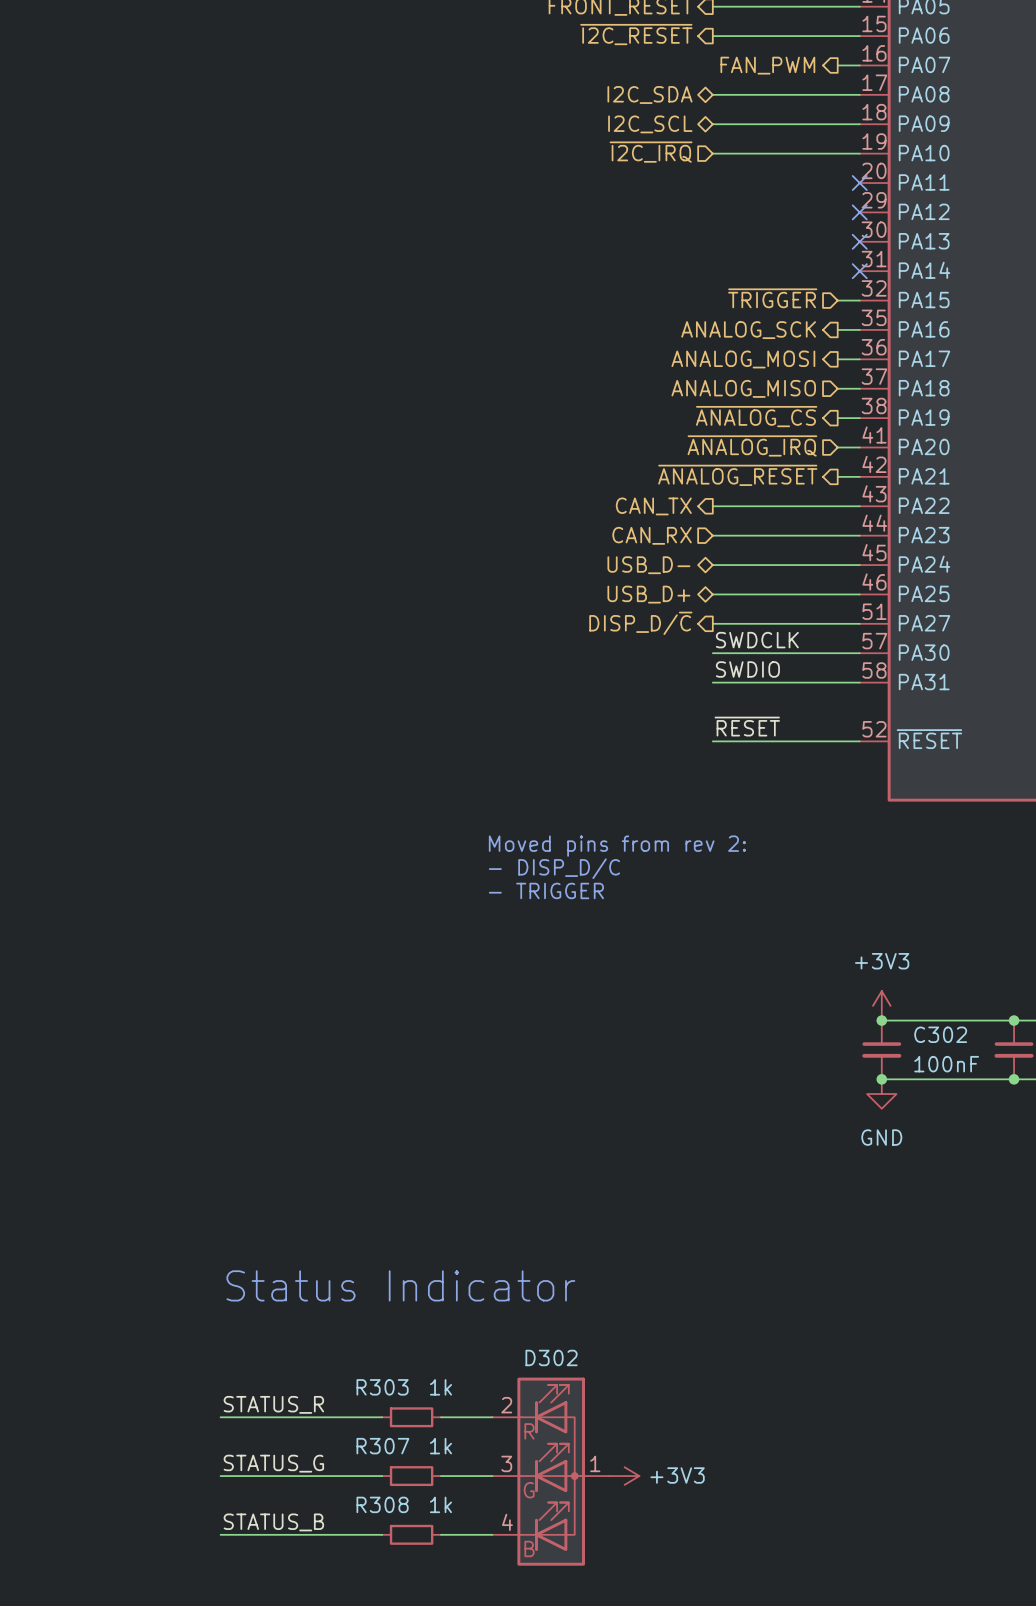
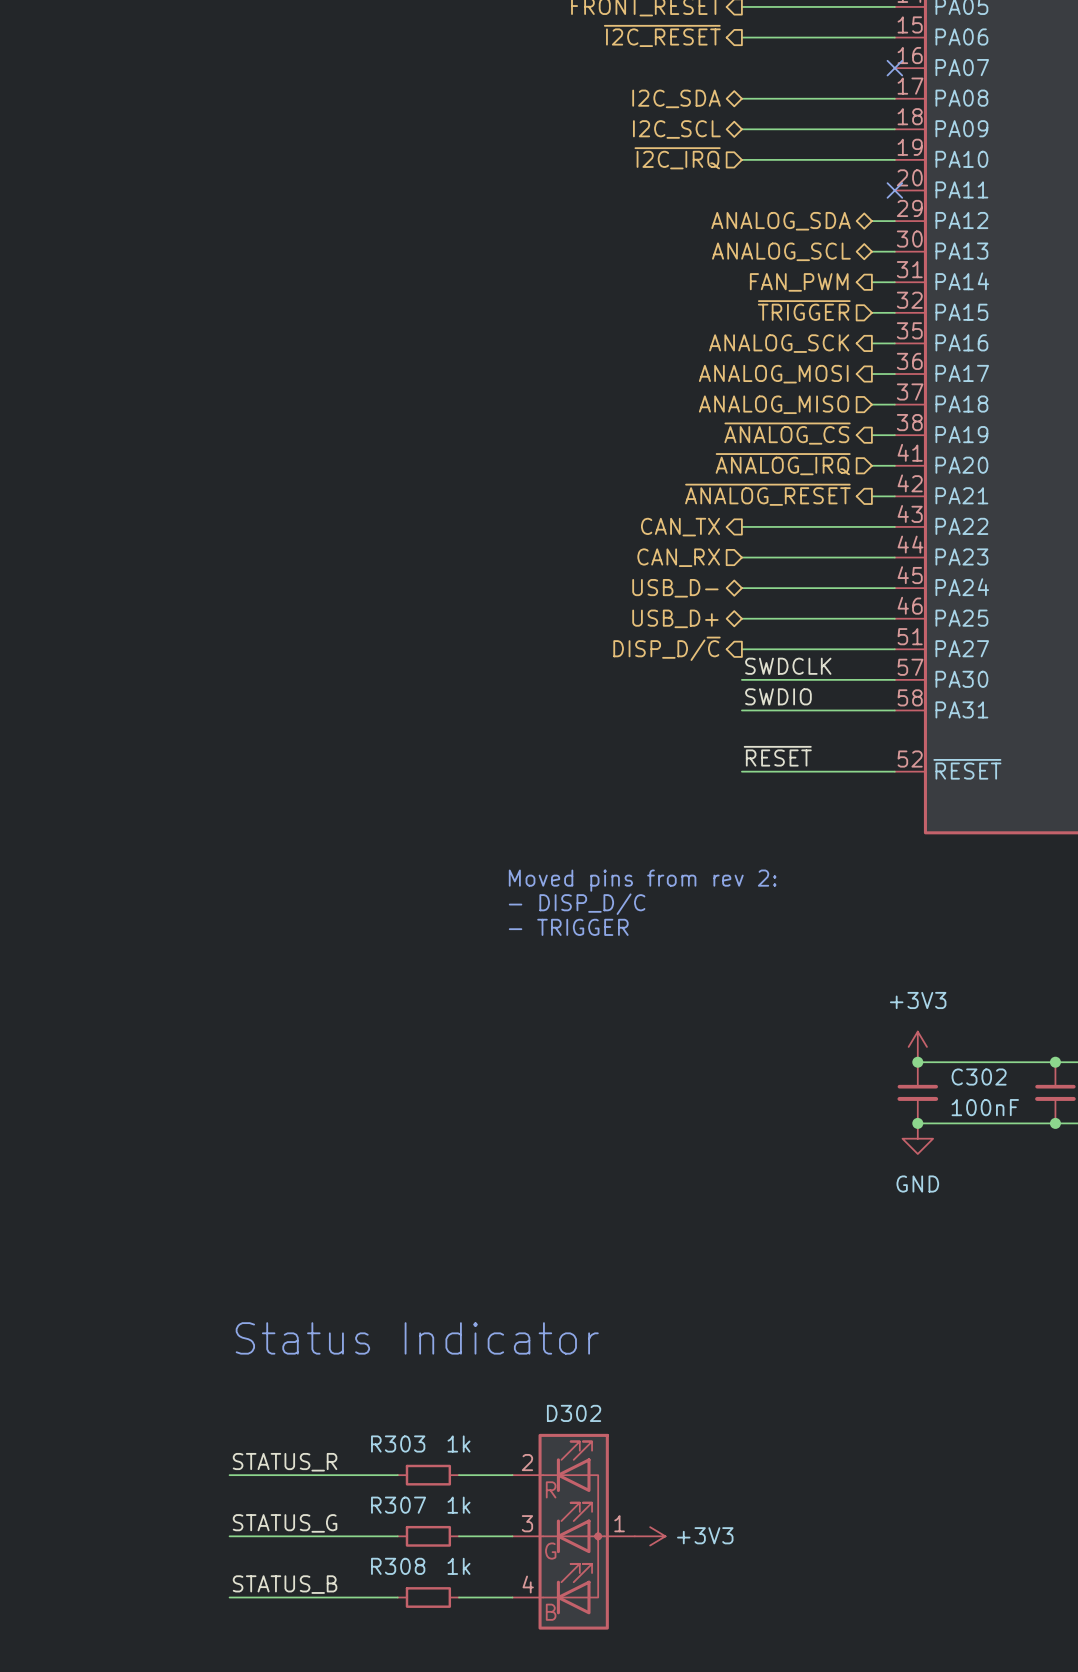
hierarchical label position: FAN_PWM (767, 65) -> FAN_PWM (799, 282)
wire: (837, 65) (859, 65) -> (871, 221) (894, 221)
no-connect mark: none -> (894, 68)
hierarchical label: none -> ANALOG_SDA (781, 221)
no-connect mark: (859, 212) -> none
hierarchical label: none -> ANALOG_SCL (781, 251)
wire: none -> (871, 251) (894, 251)
no-connect mark: (859, 241) -> none
wire: none -> (871, 282) (894, 282)
no-connect mark: (859, 271) -> none

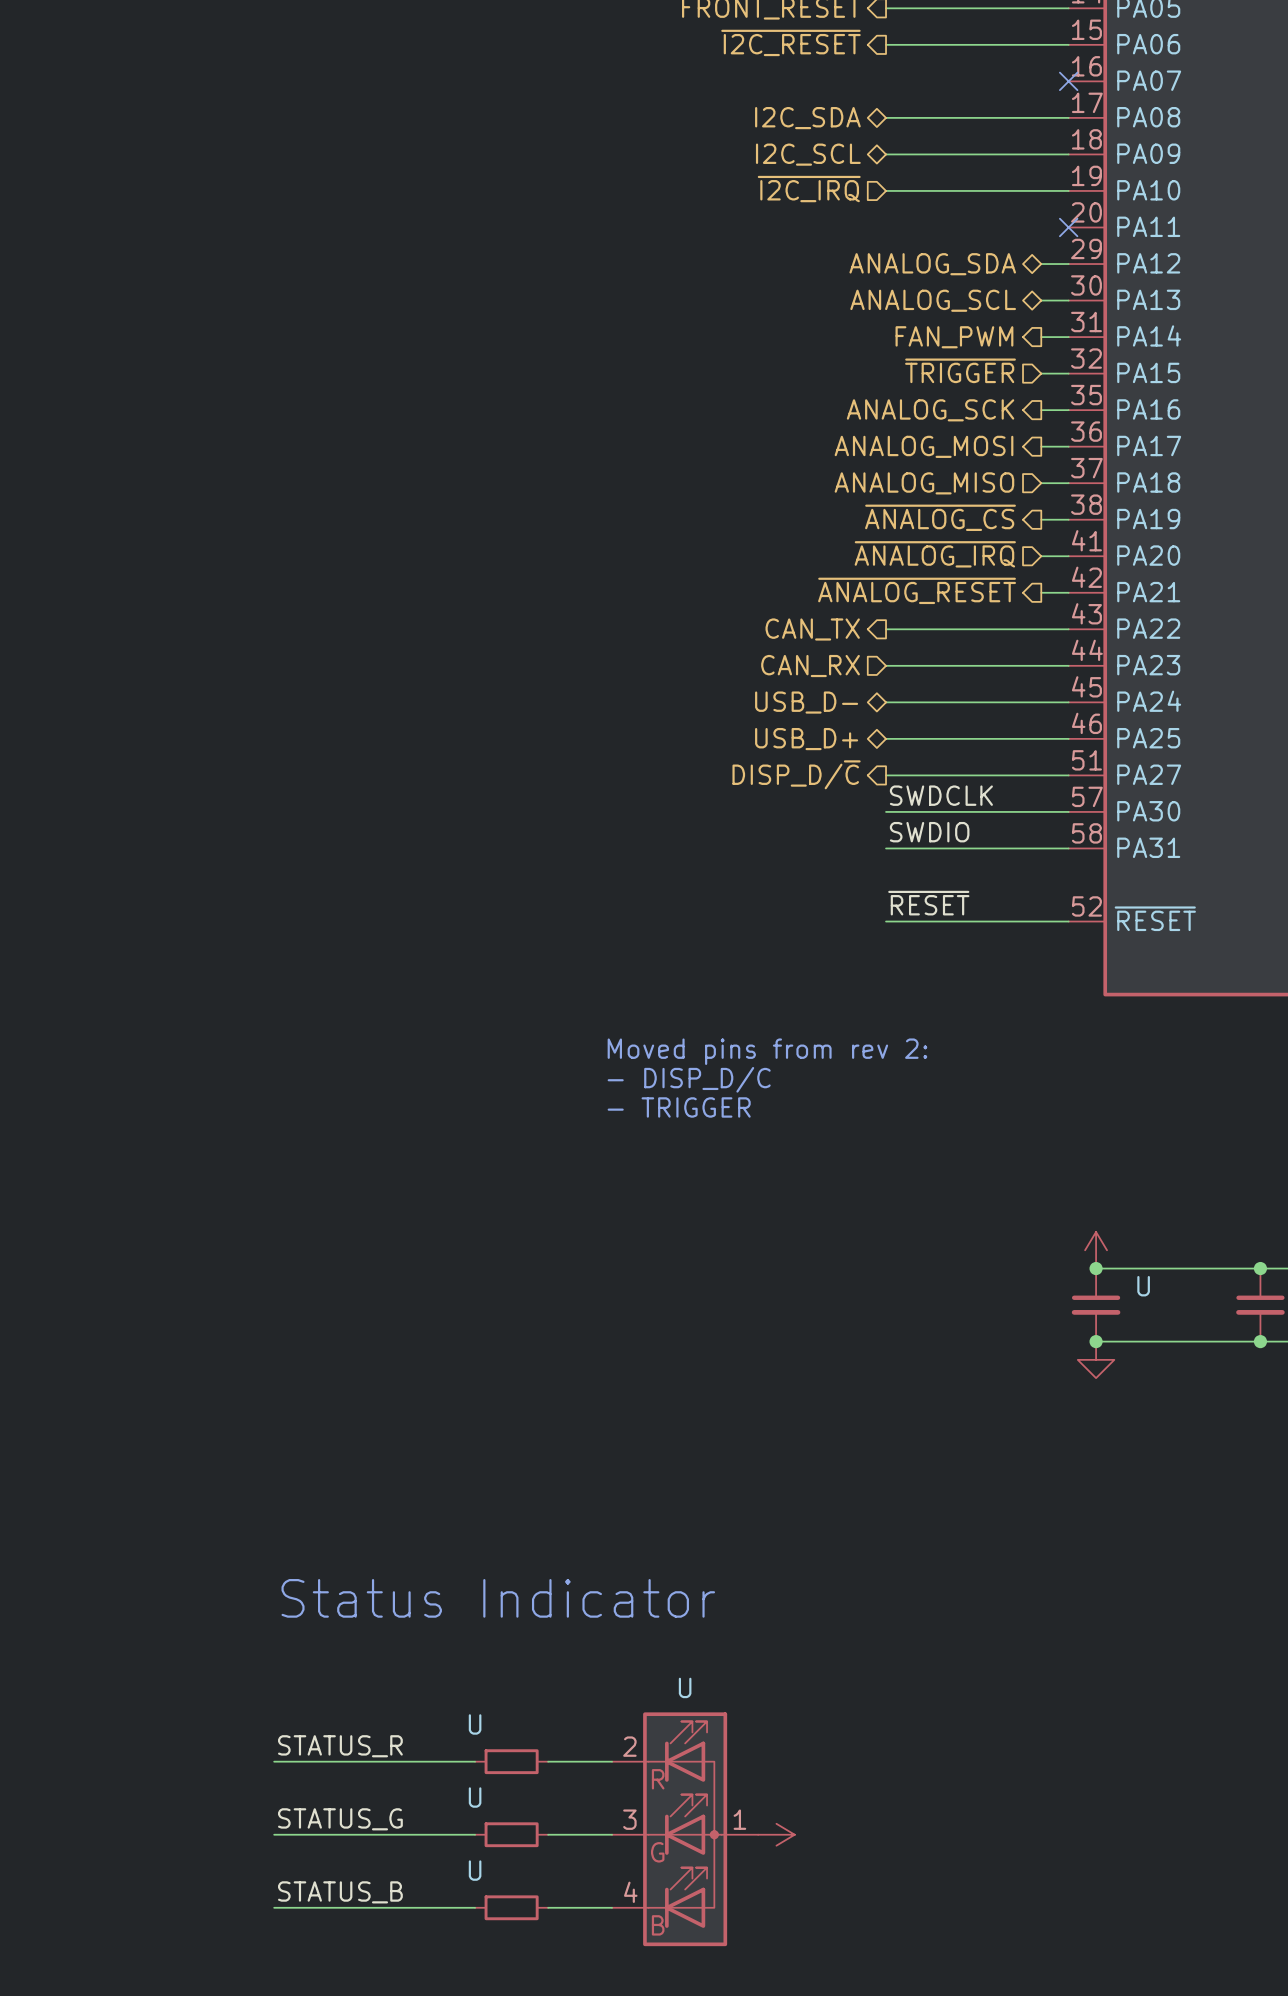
power symbol text: +3V3 (918, 1000) -> none
C302 name: C302 (979, 1077) -> U (1143, 1286)
C302 value: 100nF (985, 1107) -> none
power symbol text: GND (917, 1184) -> none
D302 name: D302 (574, 1413) -> U (685, 1687)
R303 name: R303 (398, 1444) -> U (475, 1724)
R303 value: 1k (458, 1444) -> none
R307 name: R307 (398, 1505) -> U (475, 1797)
R307 value: 1k (458, 1505) -> none
power symbol text: +3V3 (705, 1535) -> none
R308 name: R308 (398, 1566) -> U (475, 1870)
R308 value: 1k (458, 1566) -> none

